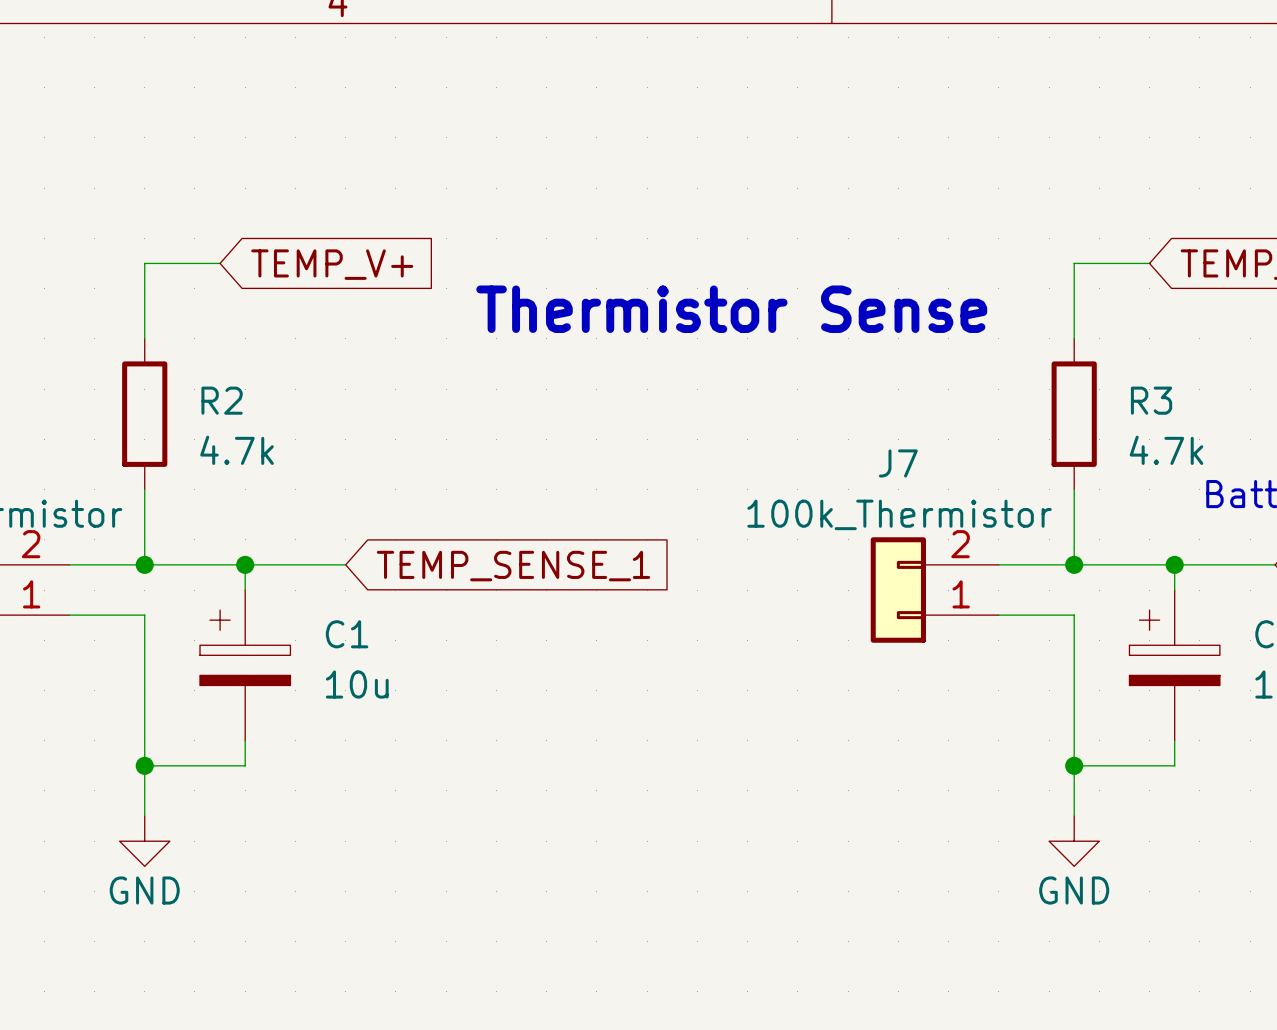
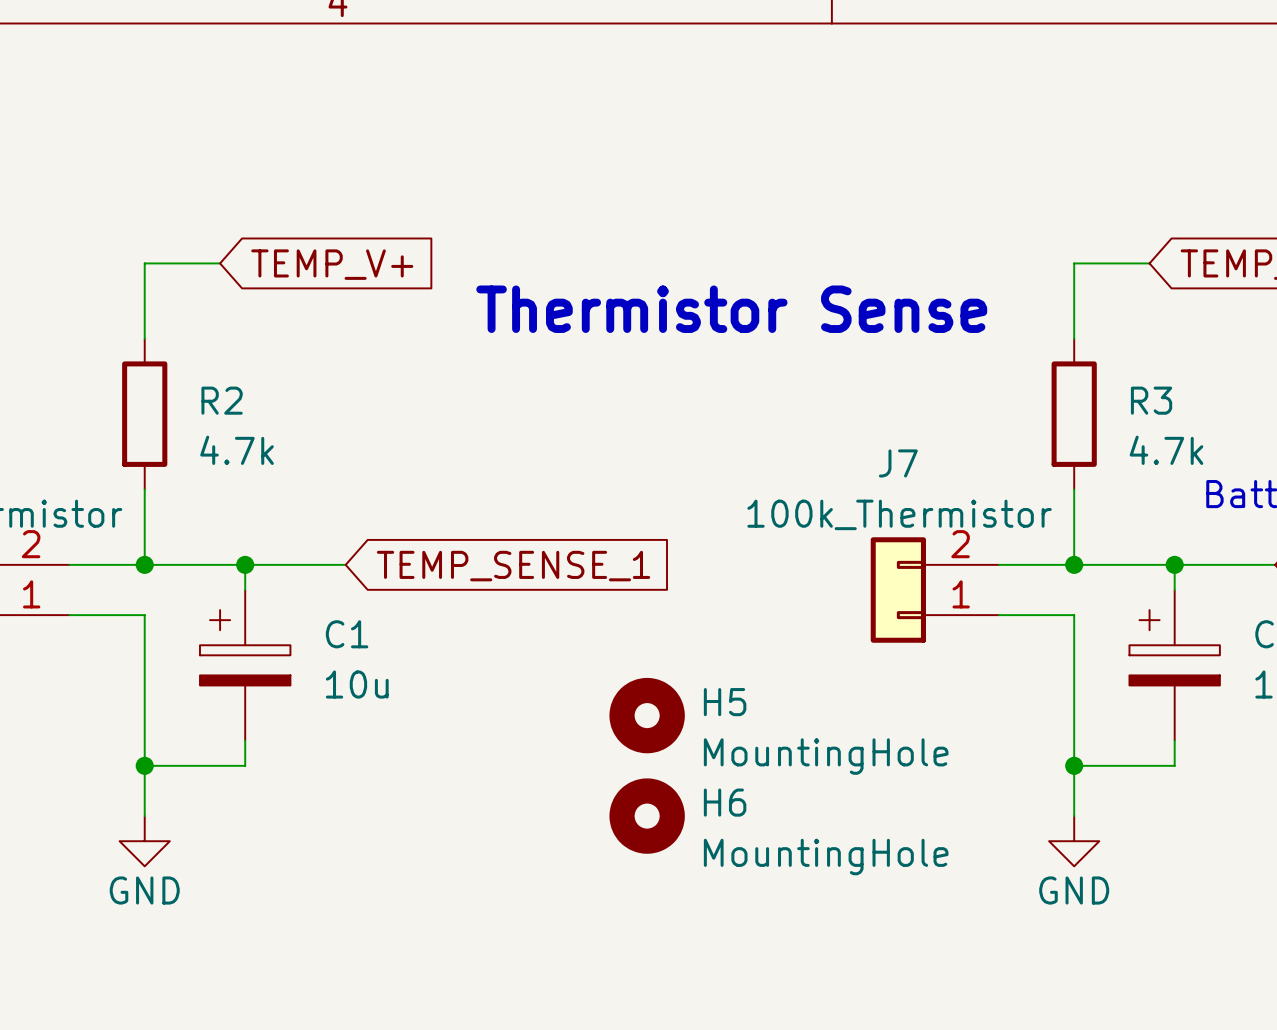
H5: none -> MountingHole (647, 715)
H6: none -> MountingHole (647, 816)

